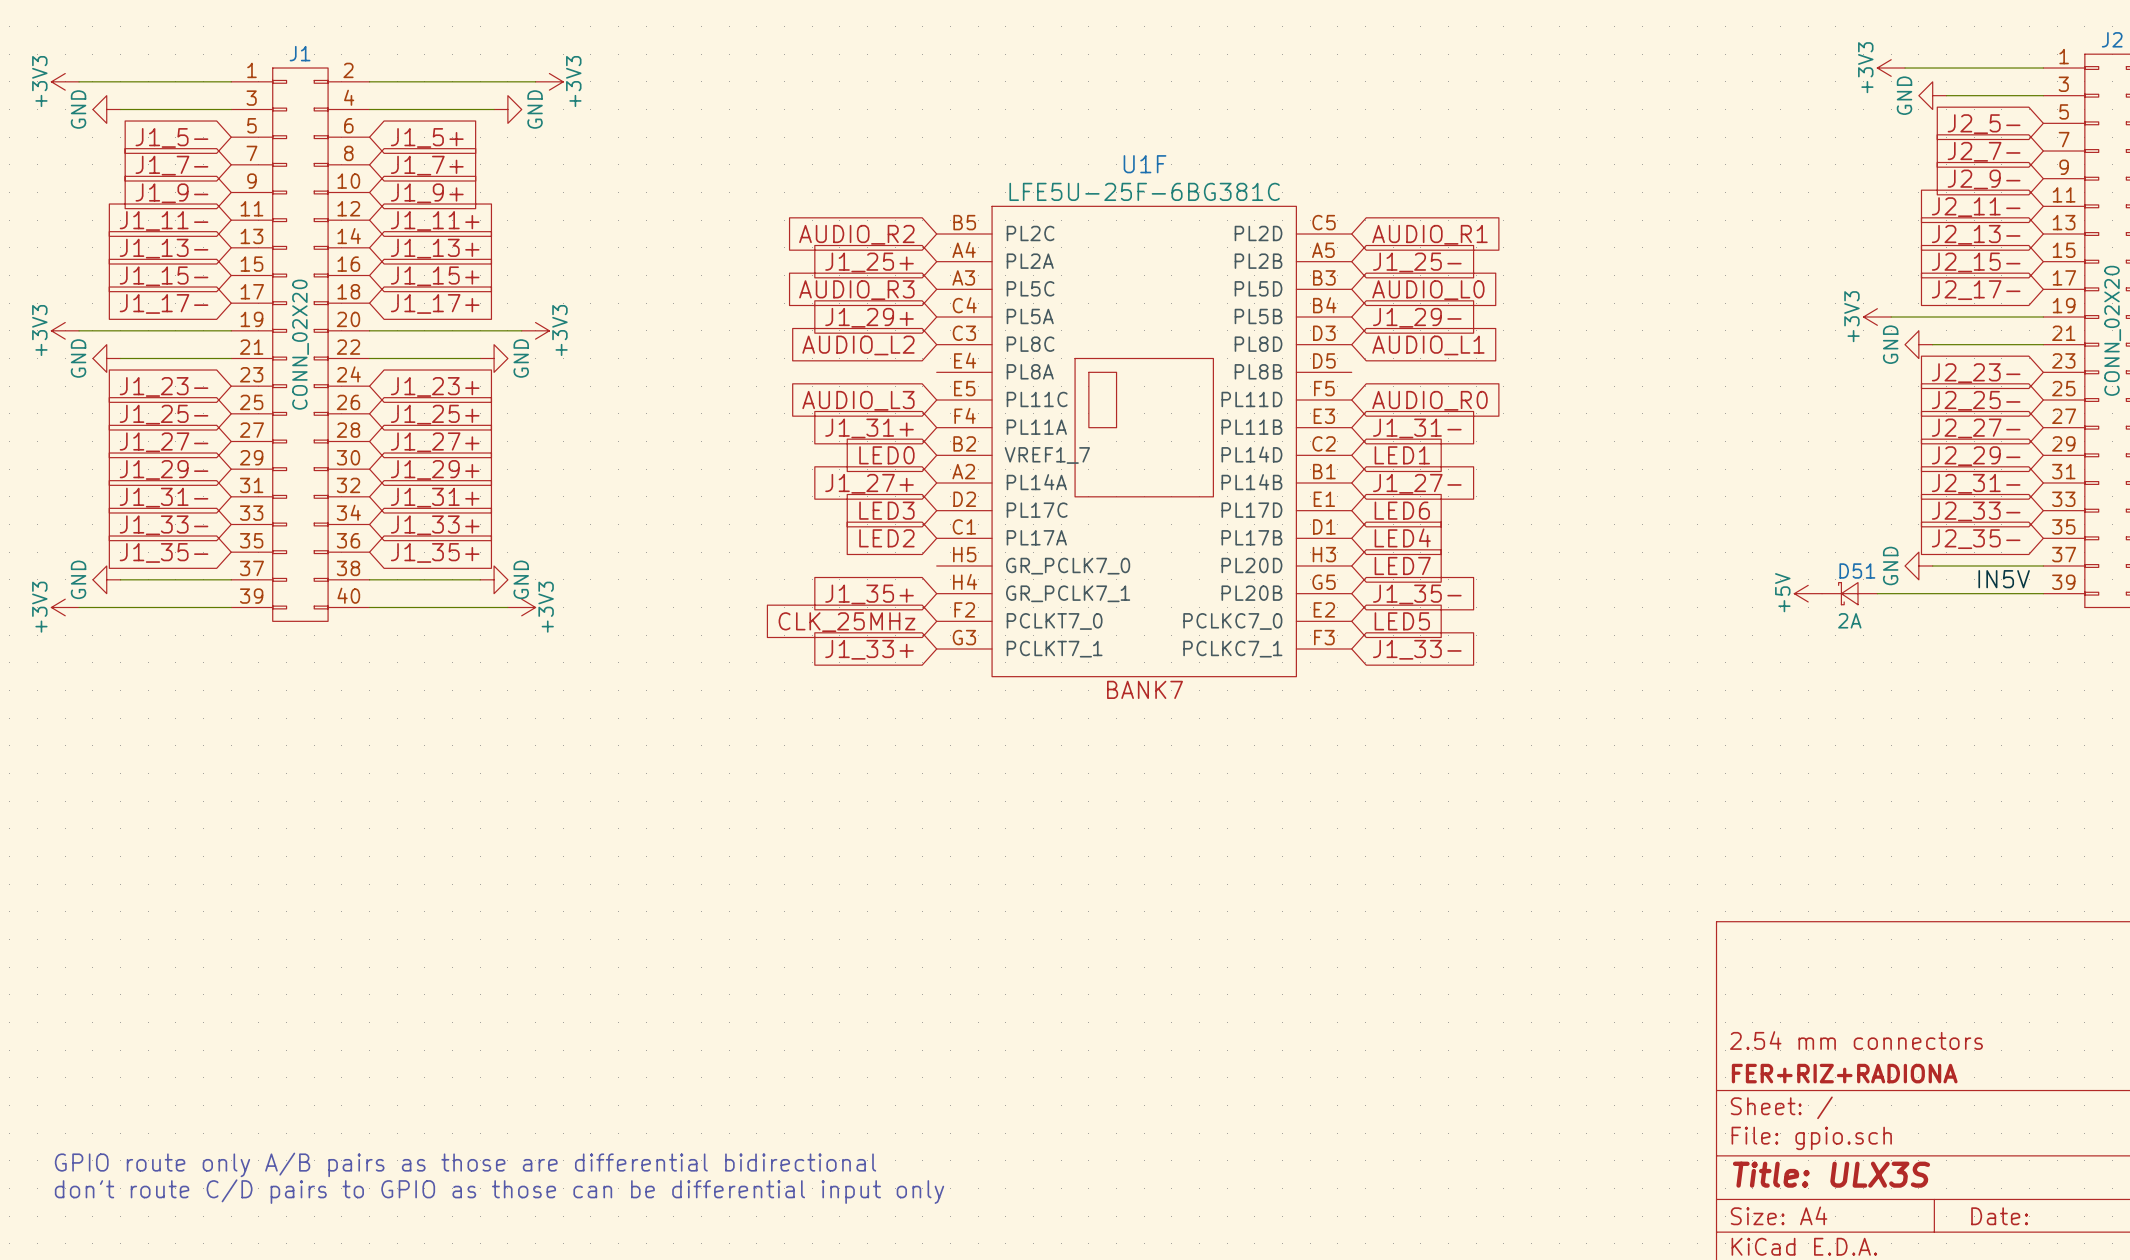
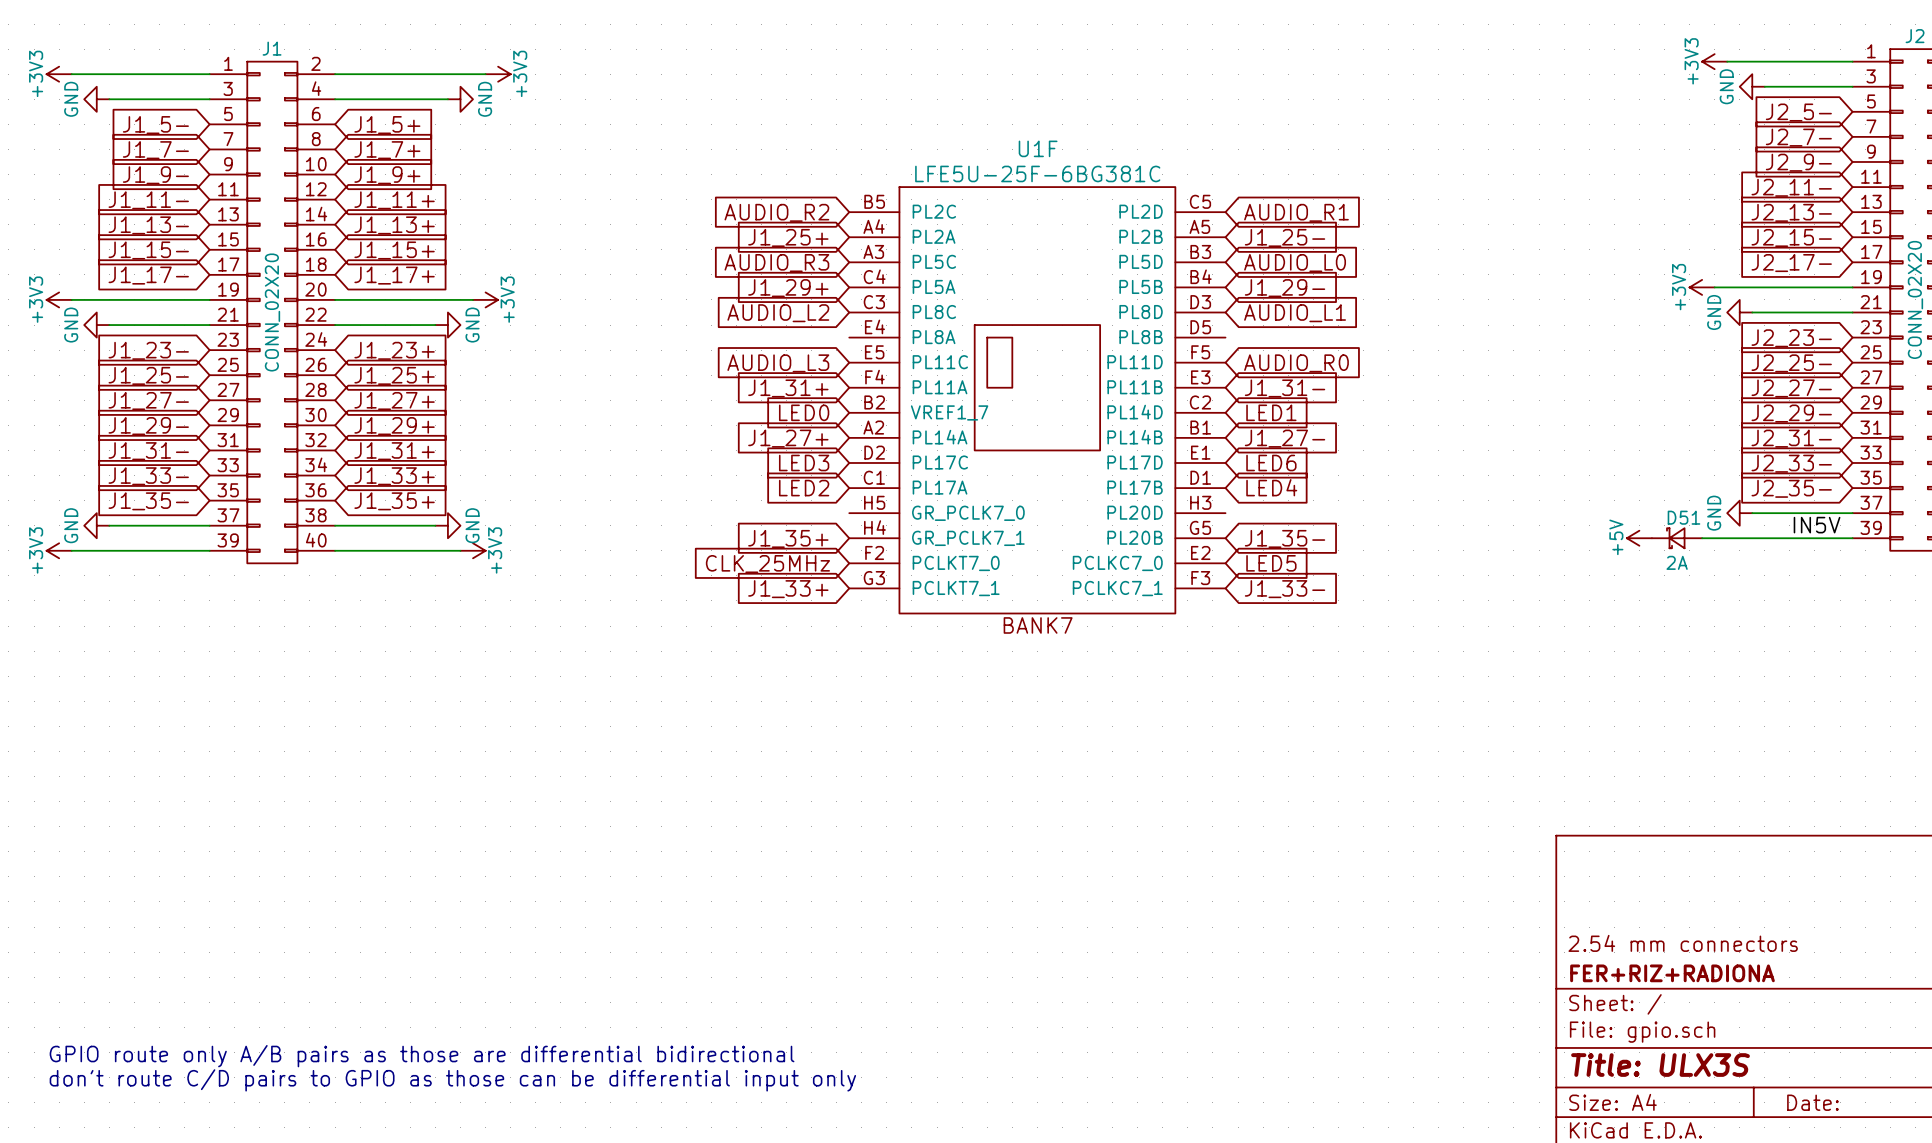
global label: LED7 (1402, 565) -> none

